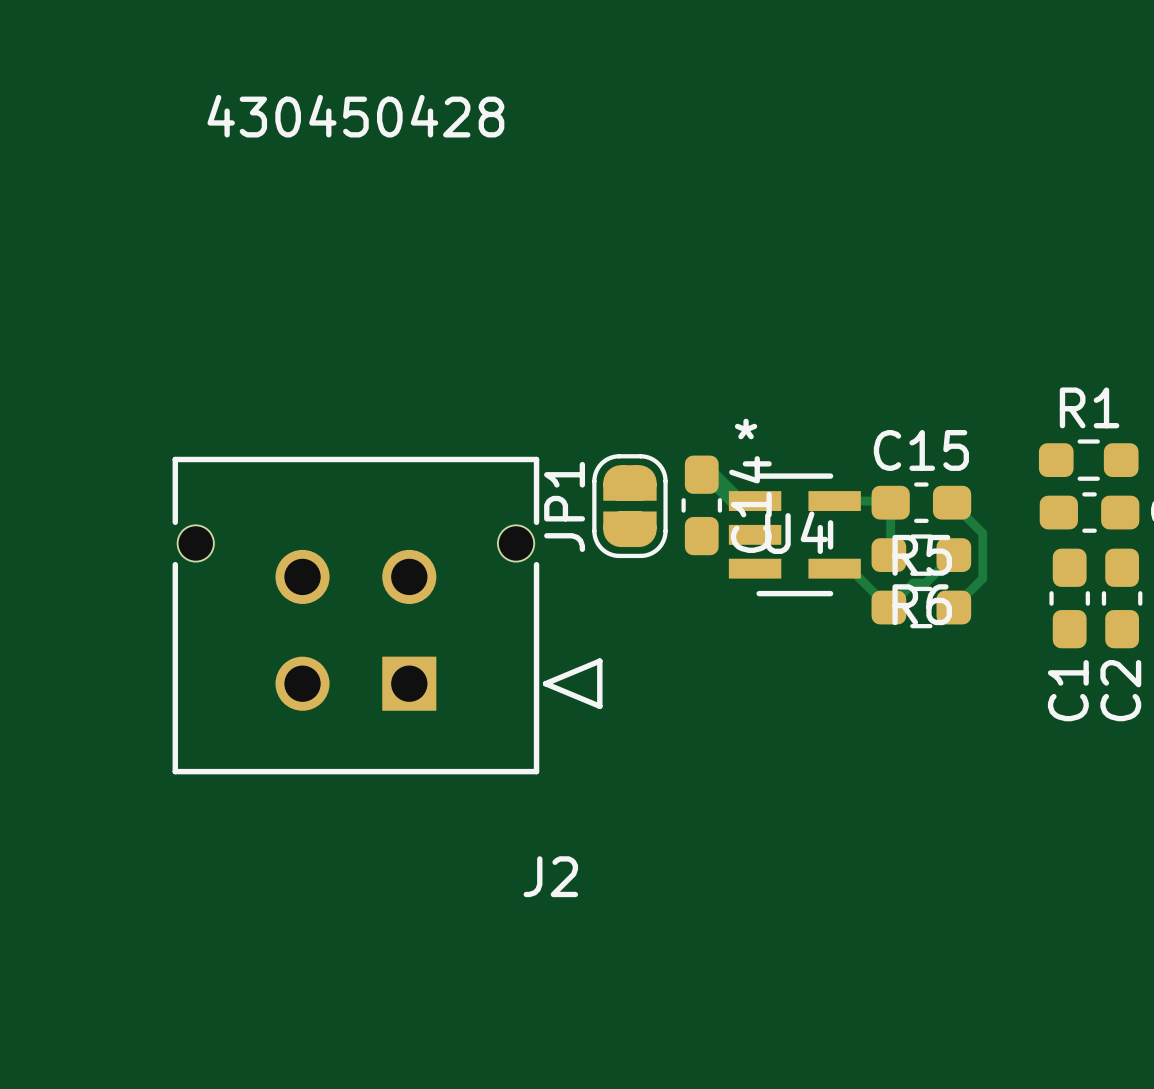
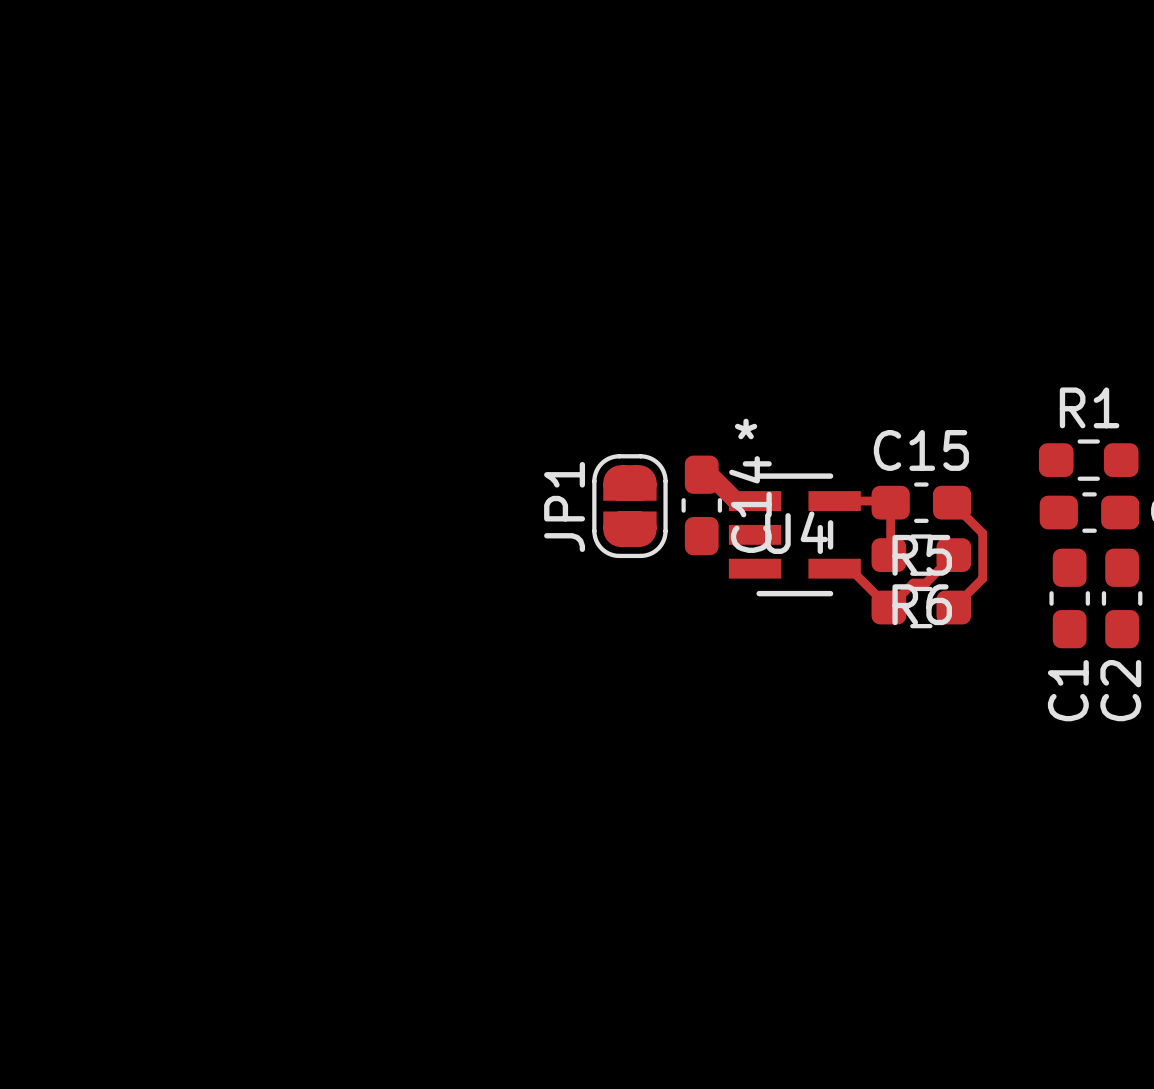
J2: (387, 615) -> none

